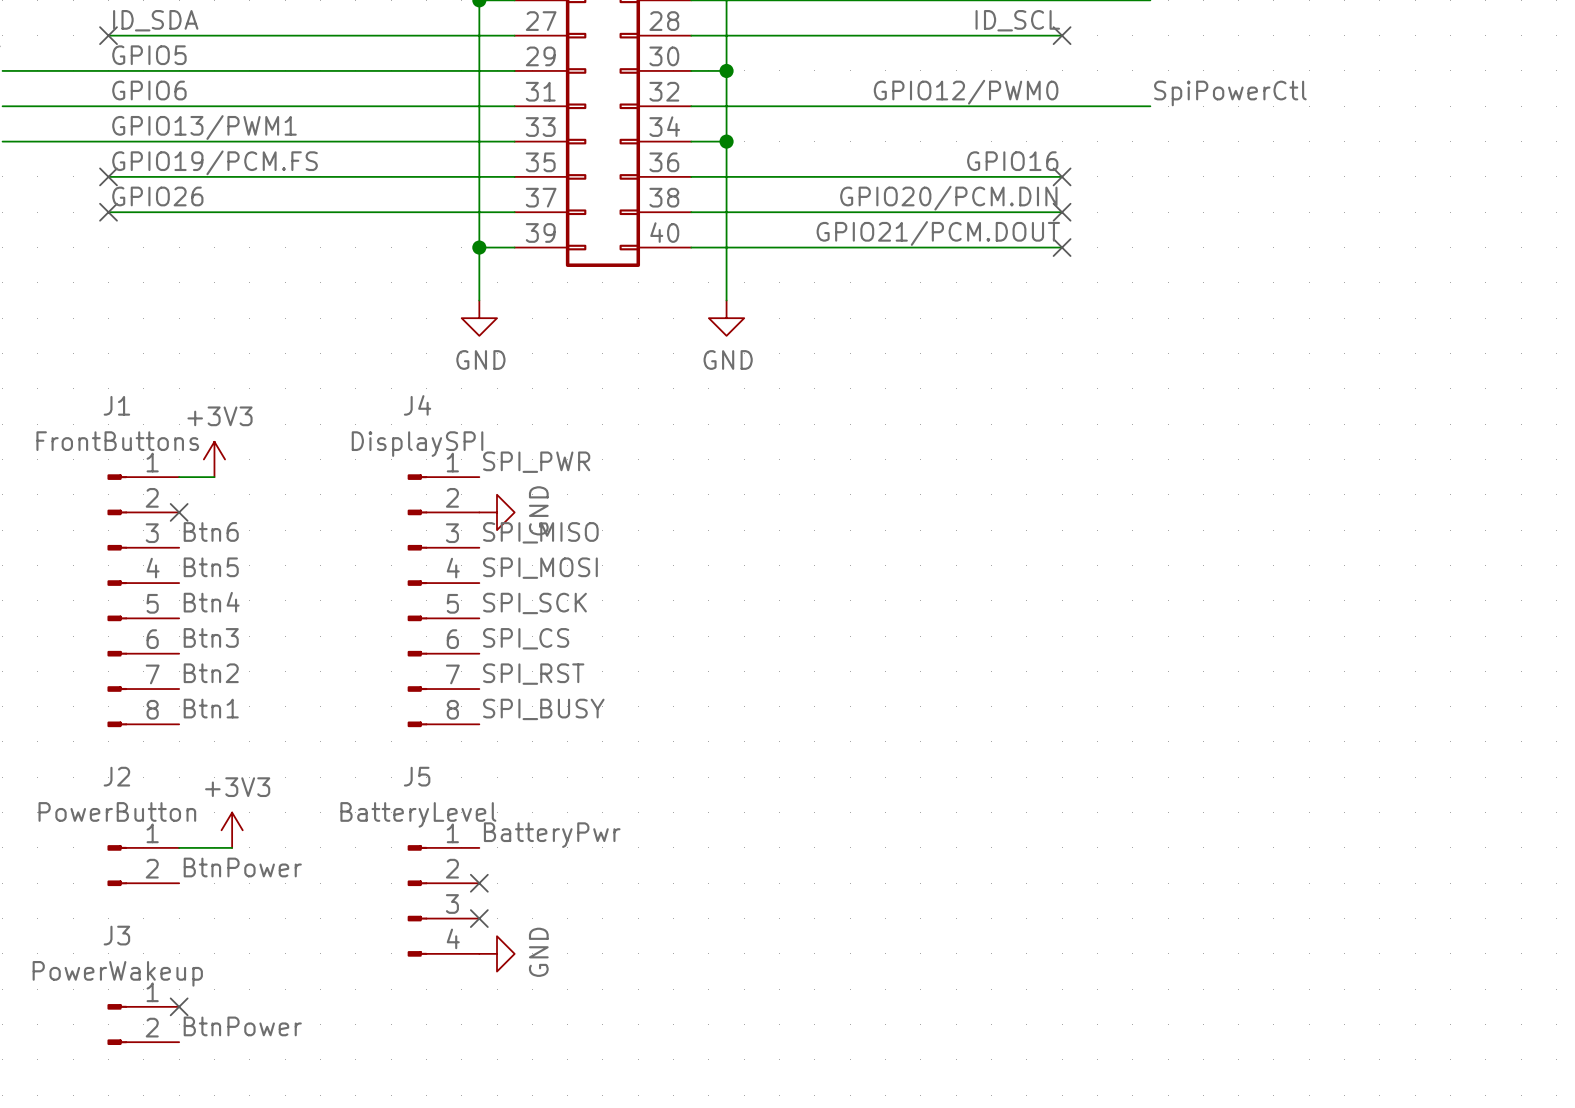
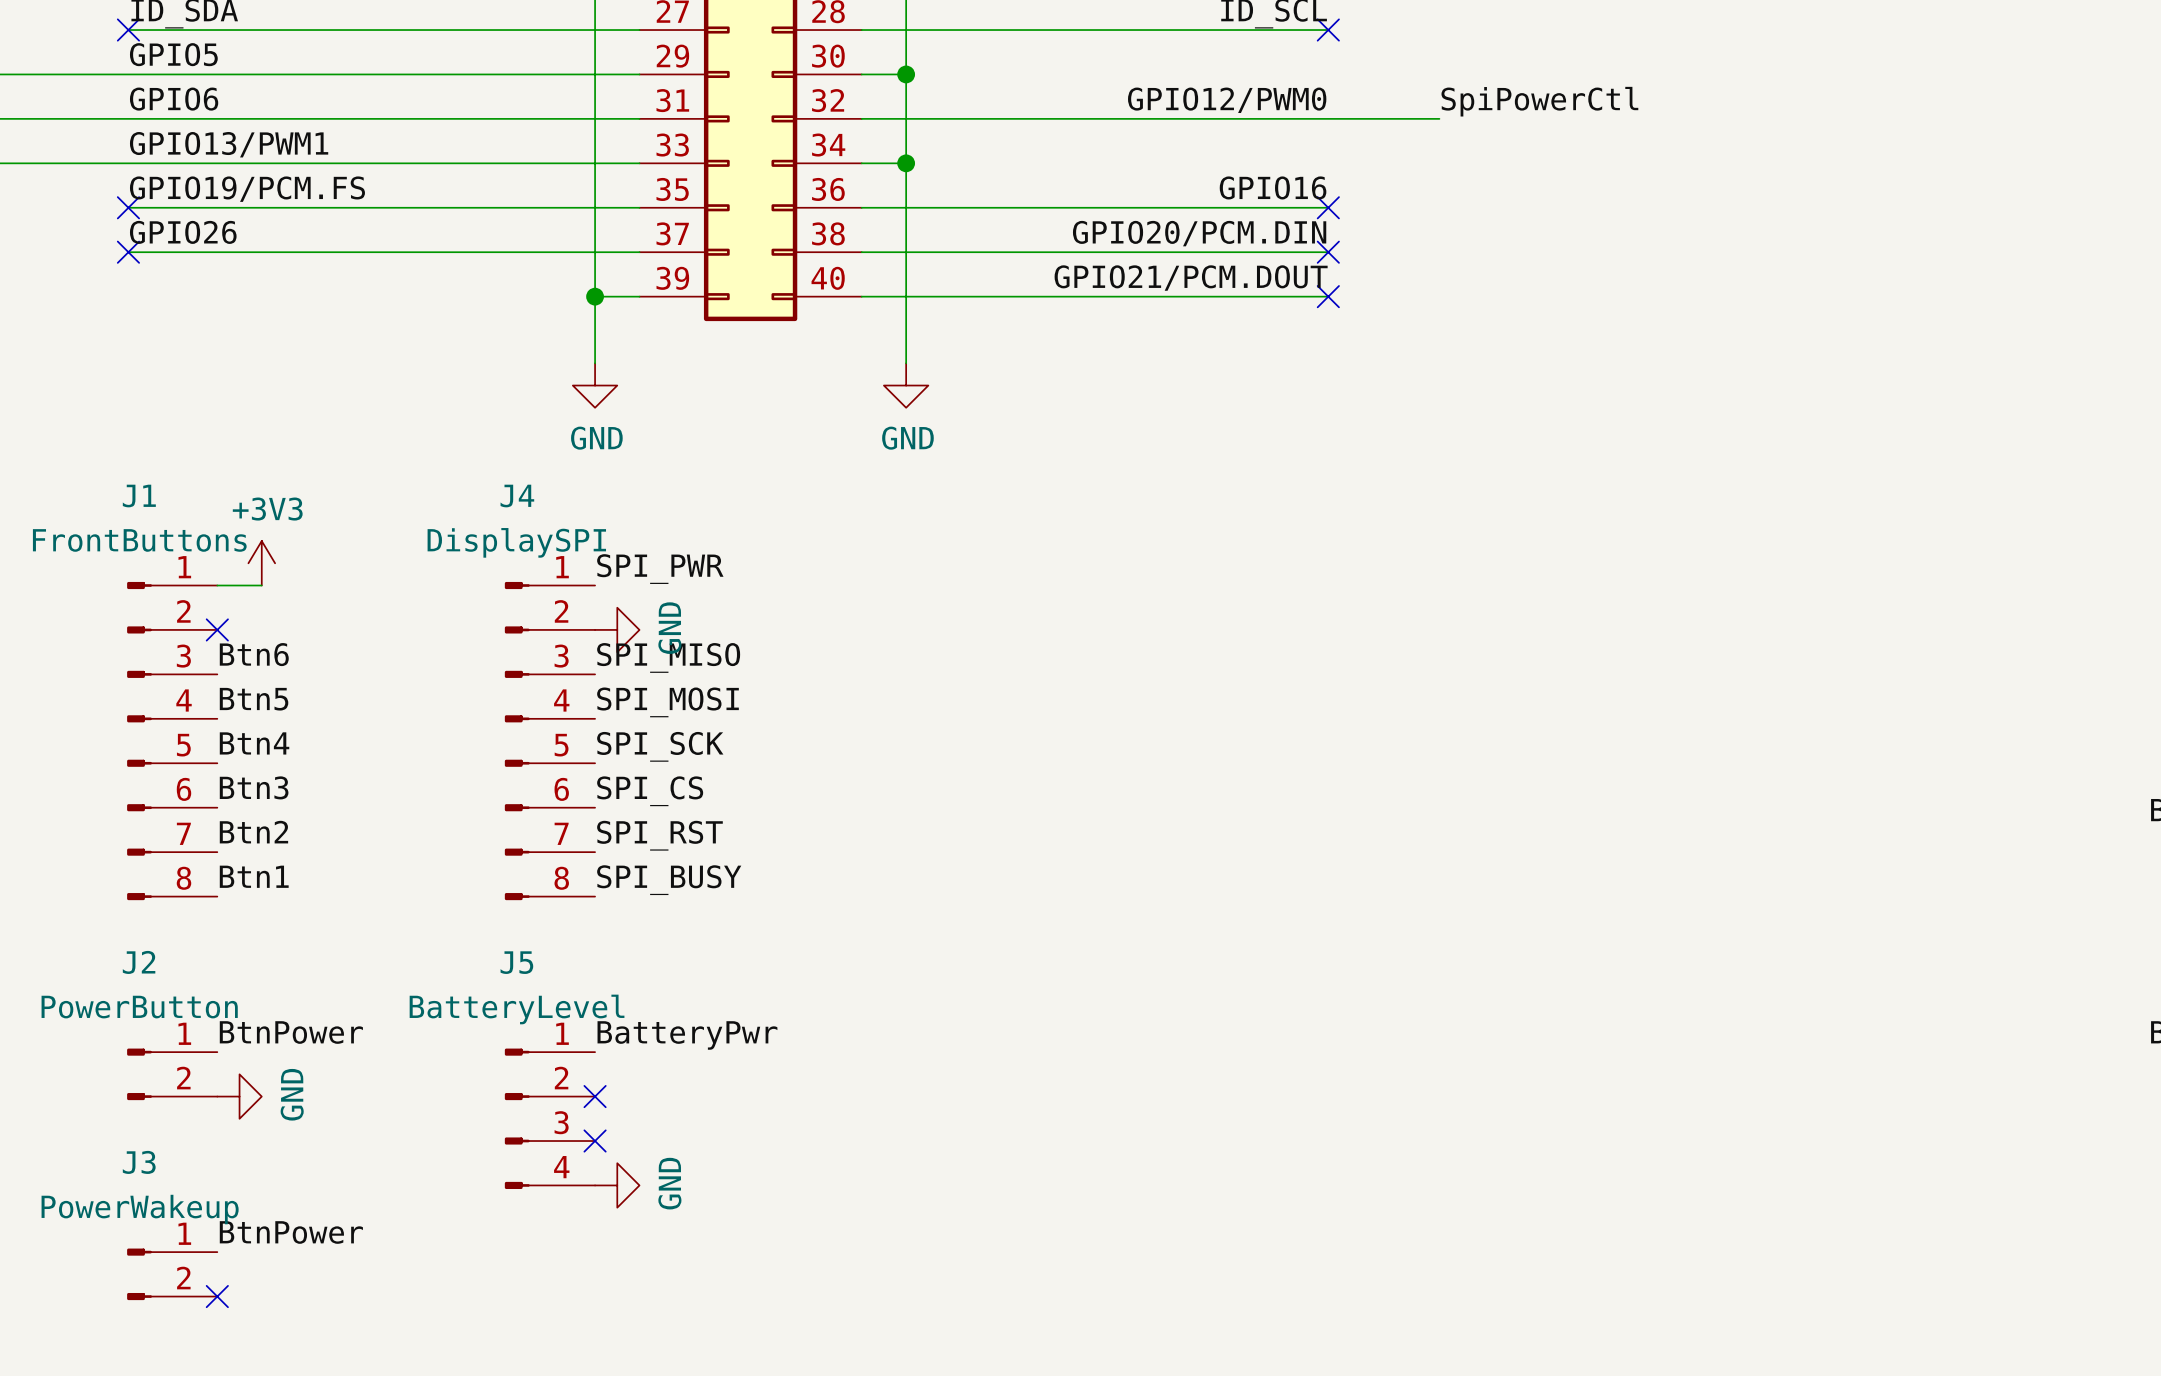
power symbol: +3V3 (232, 830) -> none
wire: (179, 847) (232, 847) -> none
label position: BtnPower (242, 867) -> BtnPower (291, 1032)
power symbol: none -> GND (239, 1096)
no-connect mark position: (179, 1006) -> (217, 1296)
label position: BtnPower (242, 1026) -> BtnPower (291, 1232)

